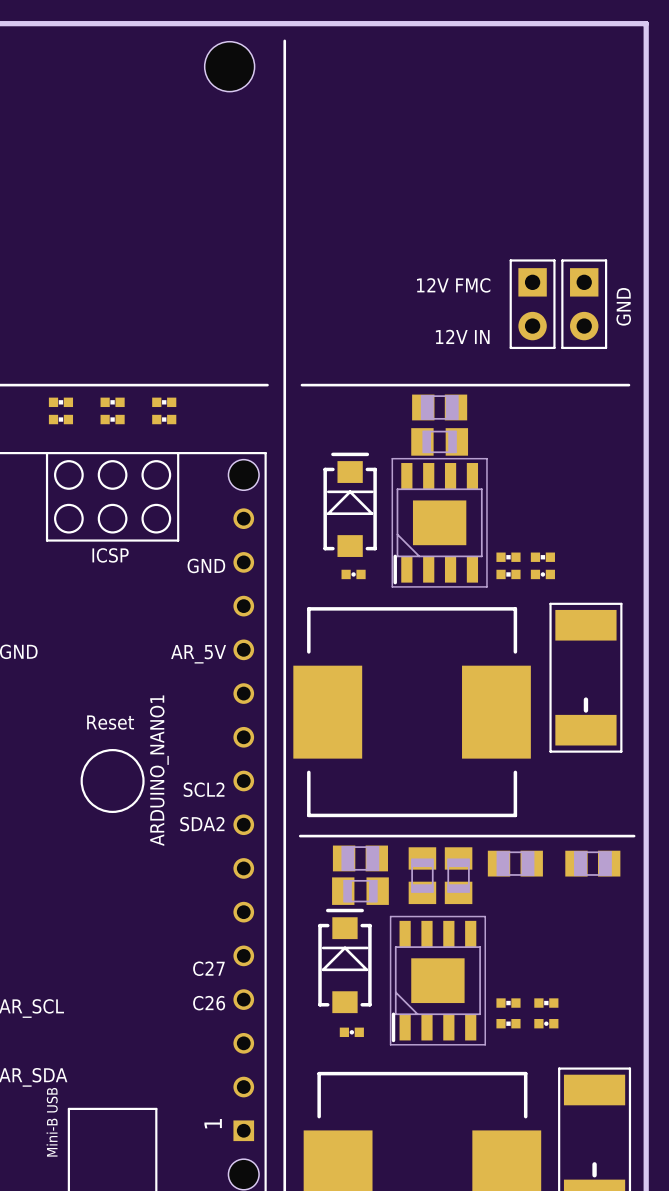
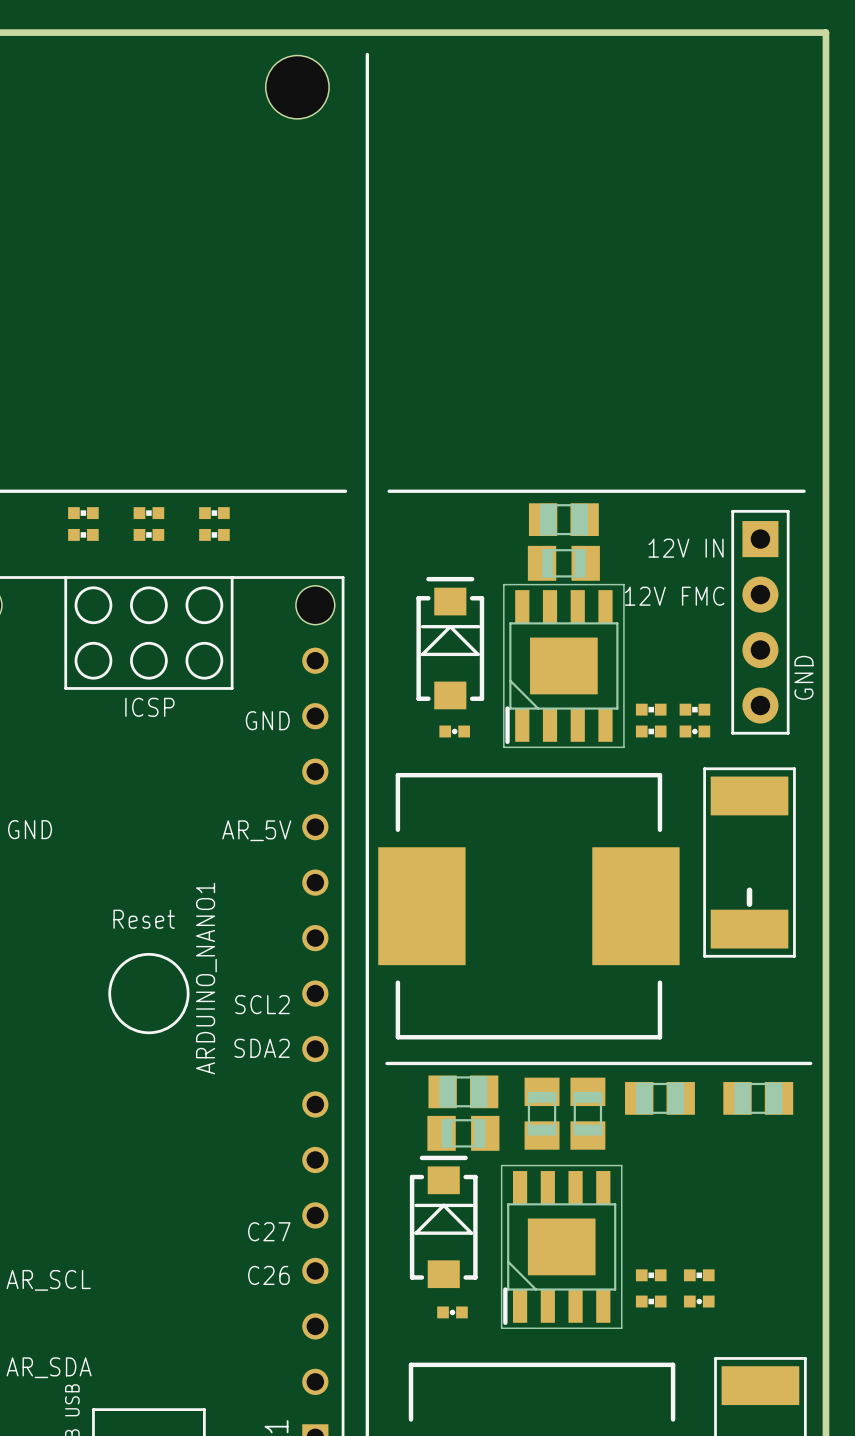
text position: 12V FMC (453, 285) -> 12V FMC (674, 596)
part: (532, 304) -> none
part: (584, 304) -> none
text position: GND (623, 306) -> GND (803, 677)
text position: 12V IN (462, 336) -> 12V IN (686, 548)
part: none -> (760, 622)

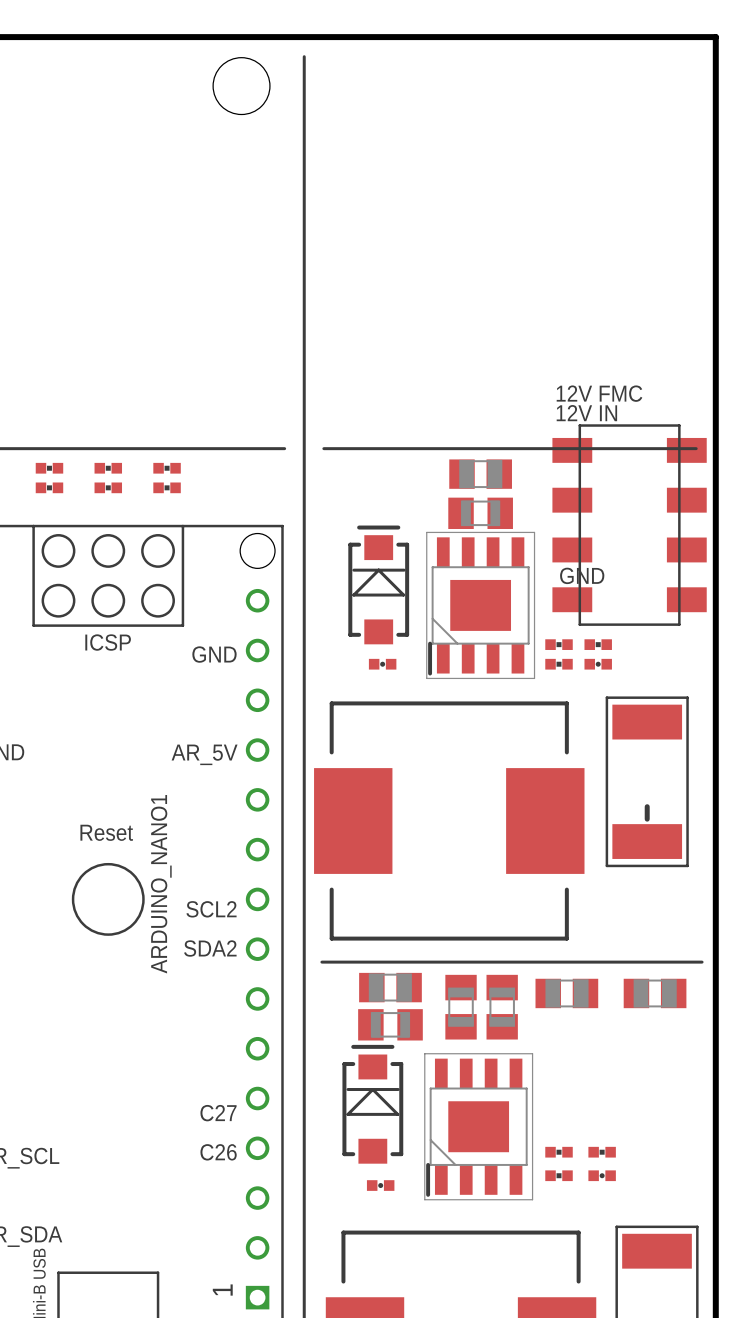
text position: 12V IN (686, 548) -> 12V IN (586, 413)
part: none -> (629, 525)
text position: 12V FMC (674, 596) -> 12V FMC (599, 393)
part: (760, 622) -> none
text rotation: 0° (803, 677) -> 90° clockwise (582, 575)
text position: GND (803, 677) -> GND (582, 575)

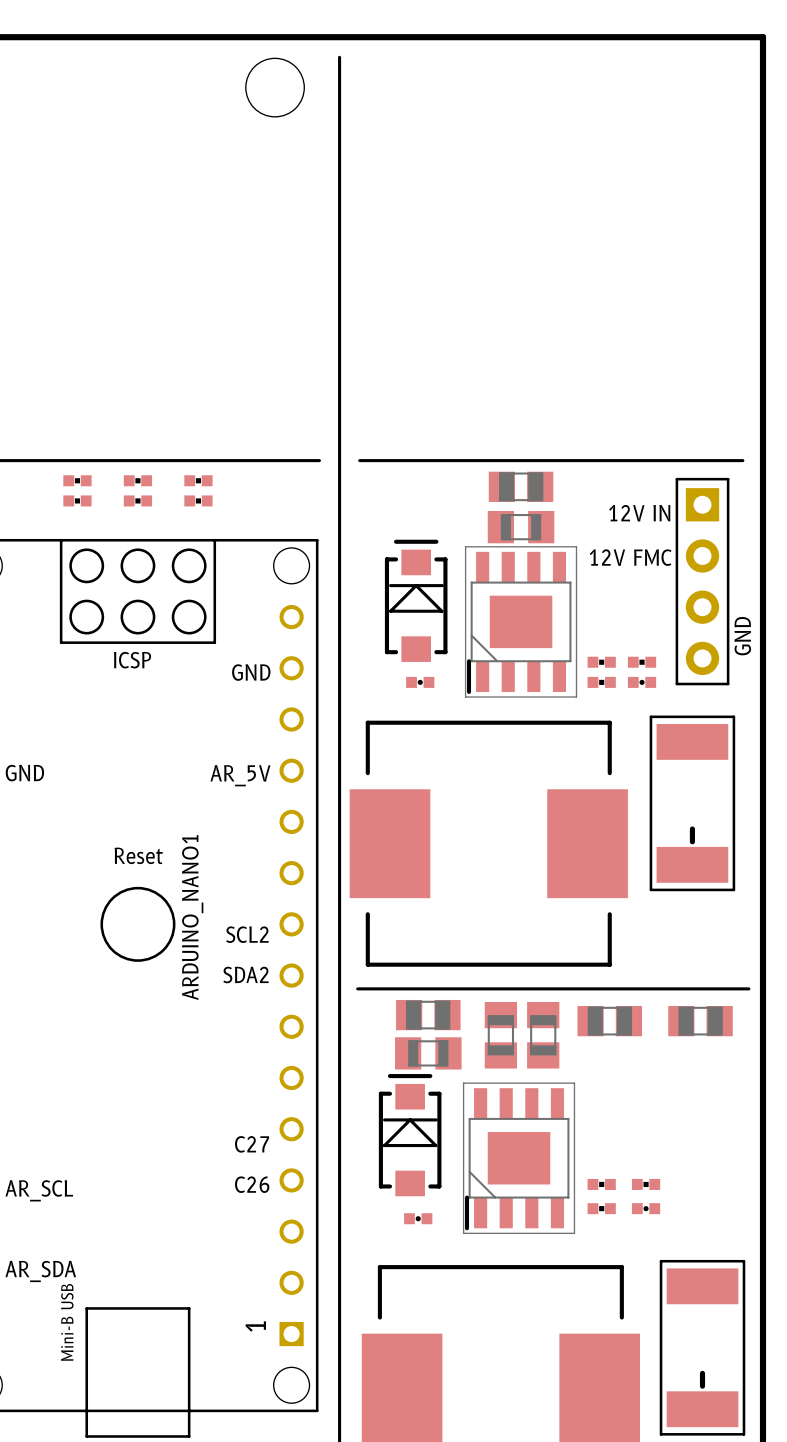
text position: 12V FMC (599, 393) -> 12V FMC (630, 557)
text position: 12V IN (586, 413) -> 12V IN (639, 513)
part: (629, 525) -> none
part: none -> (702, 581)
text rotation: 0° (582, 575) -> 90° counterclockwise (742, 636)
text position: GND (582, 575) -> GND (742, 636)

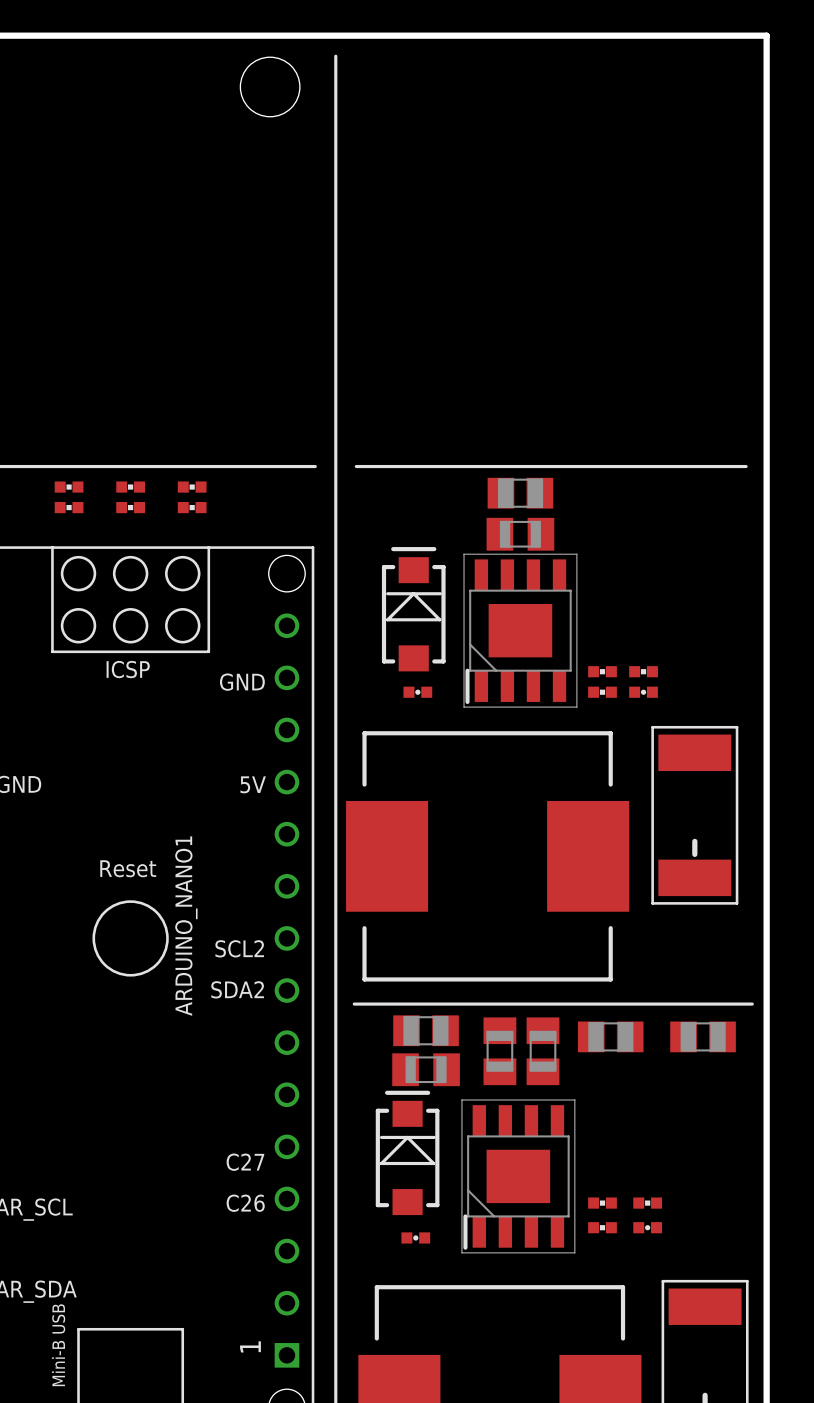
text: 12V IN (639, 513) -> none
text: 12V FMC (630, 557) -> none
part: (702, 581) -> none
text: GND (742, 636) -> none
text: AR_5V (240, 775) -> 5V (253, 784)

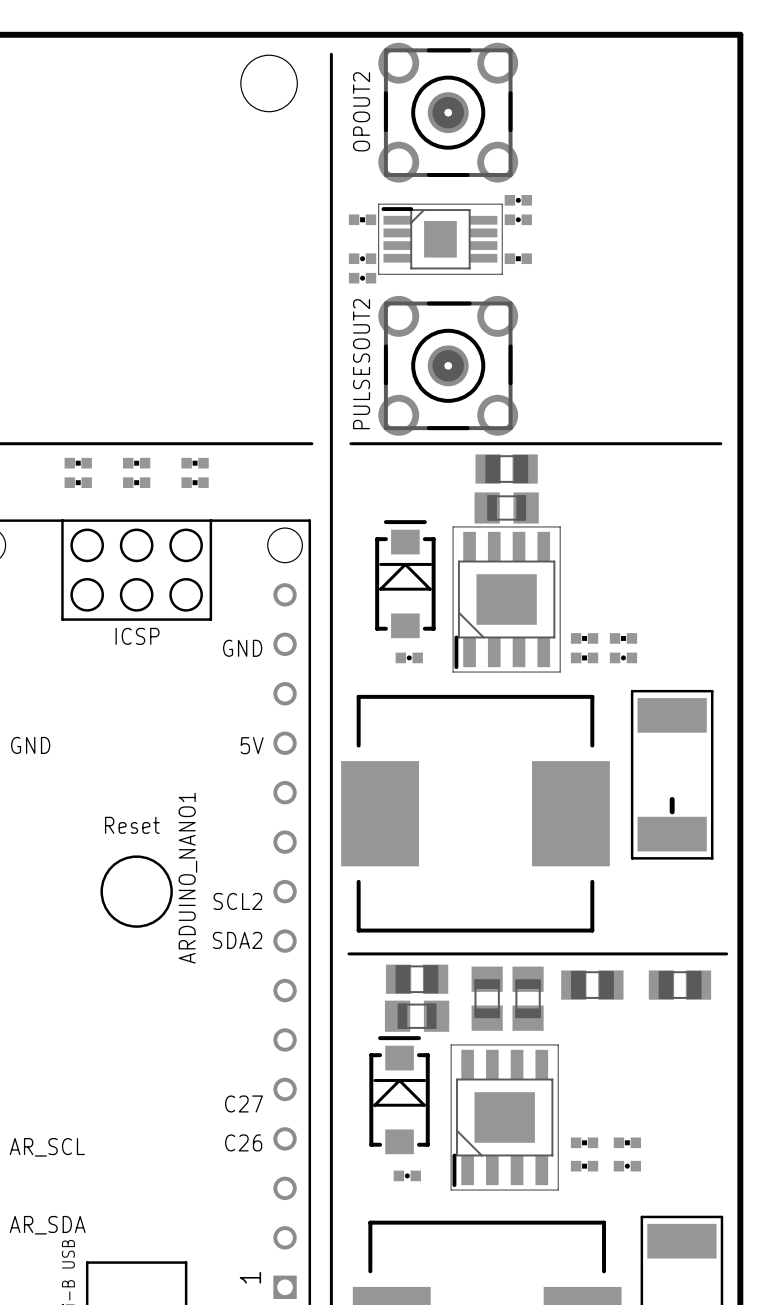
OPOUT2: none -> (448, 112)
part: none -> (518, 200)
part: none -> (362, 219)
part: none -> (518, 219)
part: none -> (440, 239)
part: none -> (362, 258)
part: none -> (518, 258)
part: none -> (362, 278)
PULSESOUT2: none -> (448, 365)

